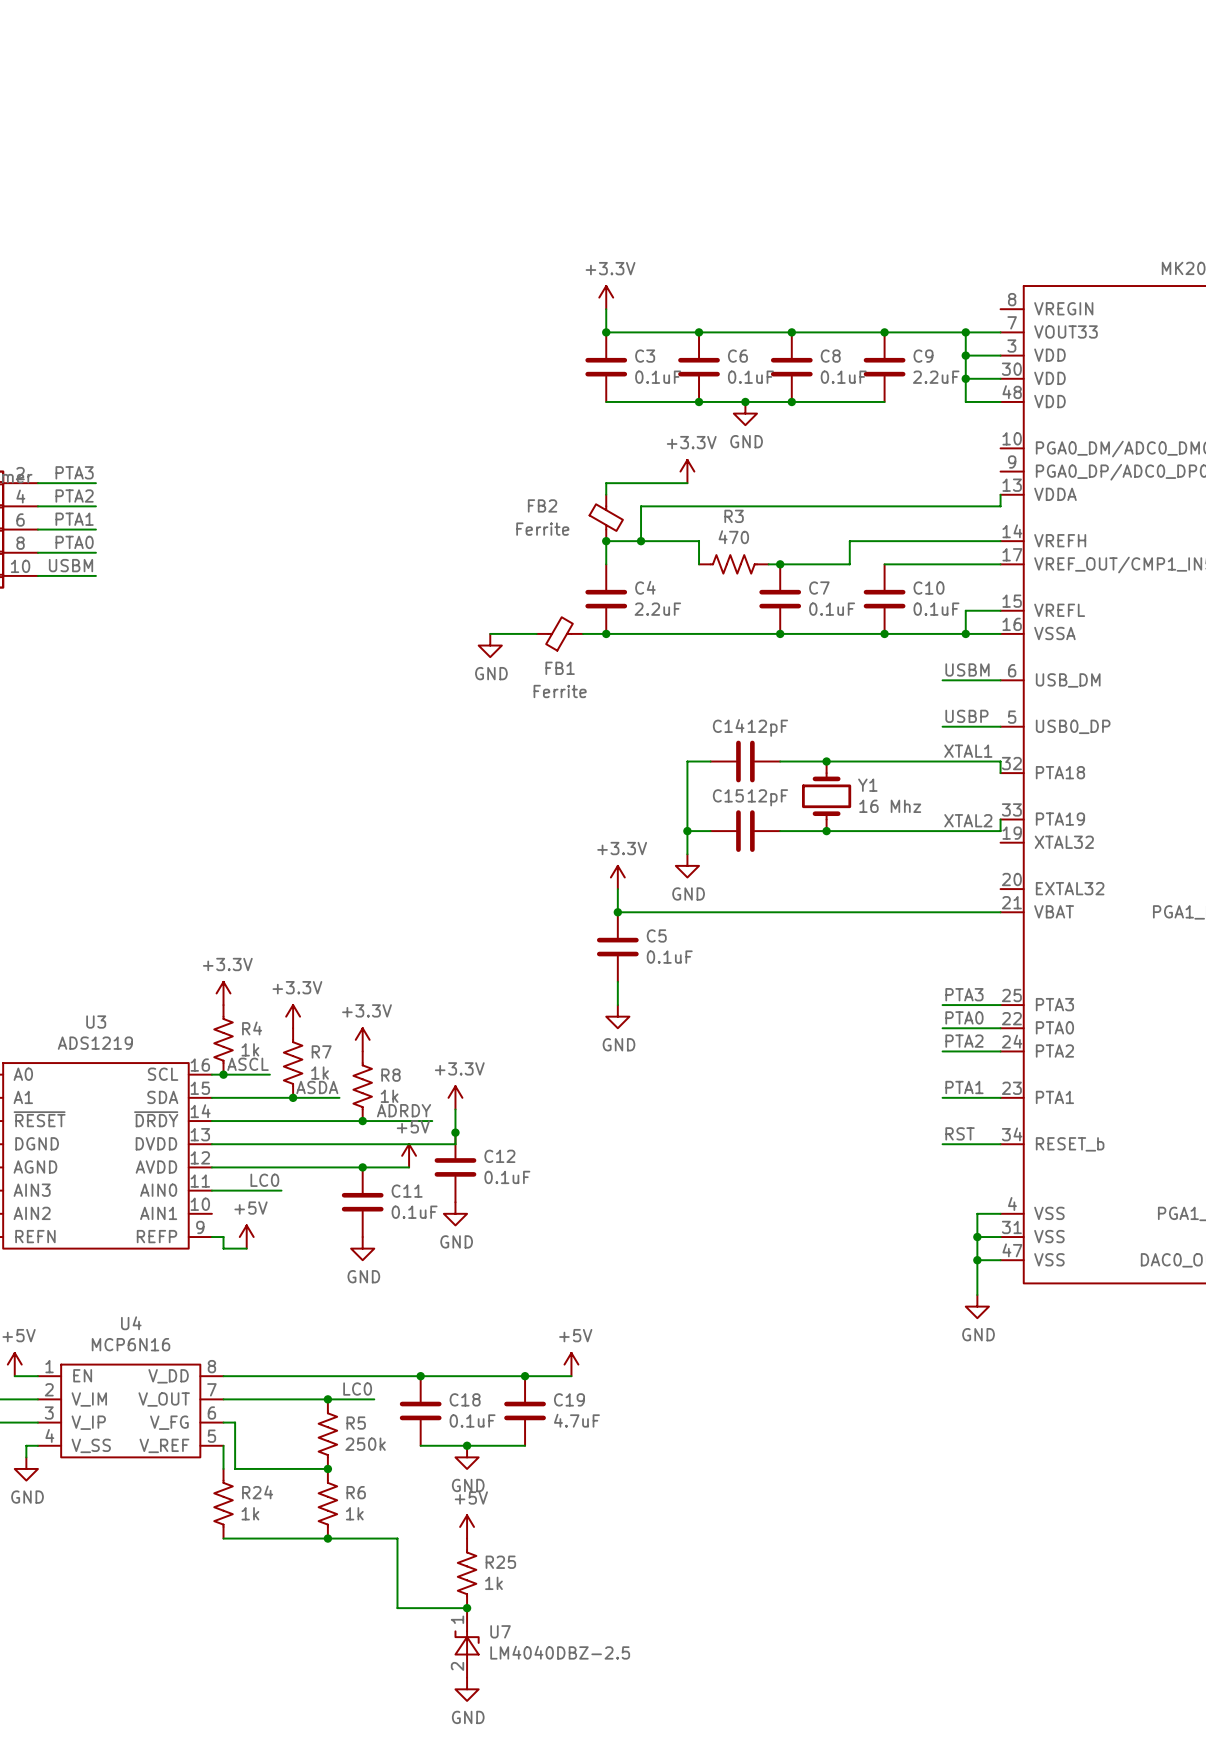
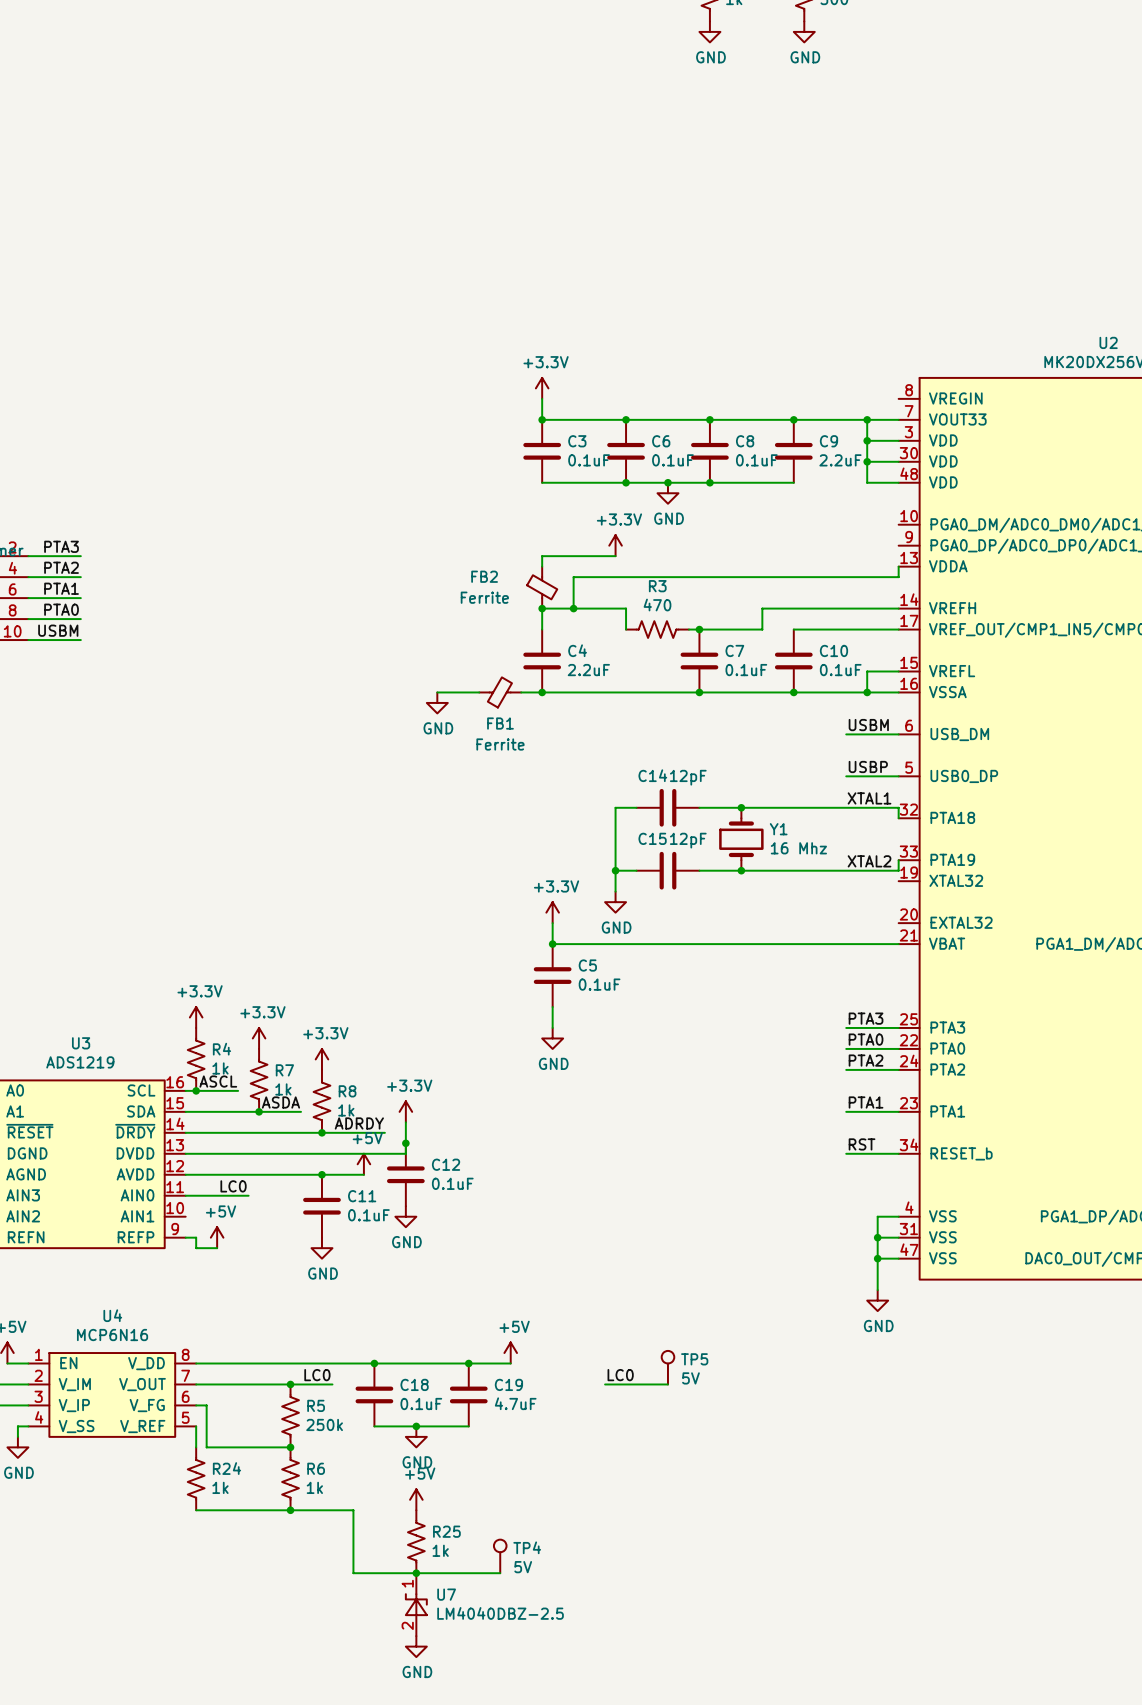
TP5: none -> 5V (667, 1367)
label: none -> LC0 (620, 1375)
wire: none -> (605, 1384) (667, 1384)
TP4: none -> 5V (500, 1556)
wire: none -> (416, 1573) (500, 1573)

